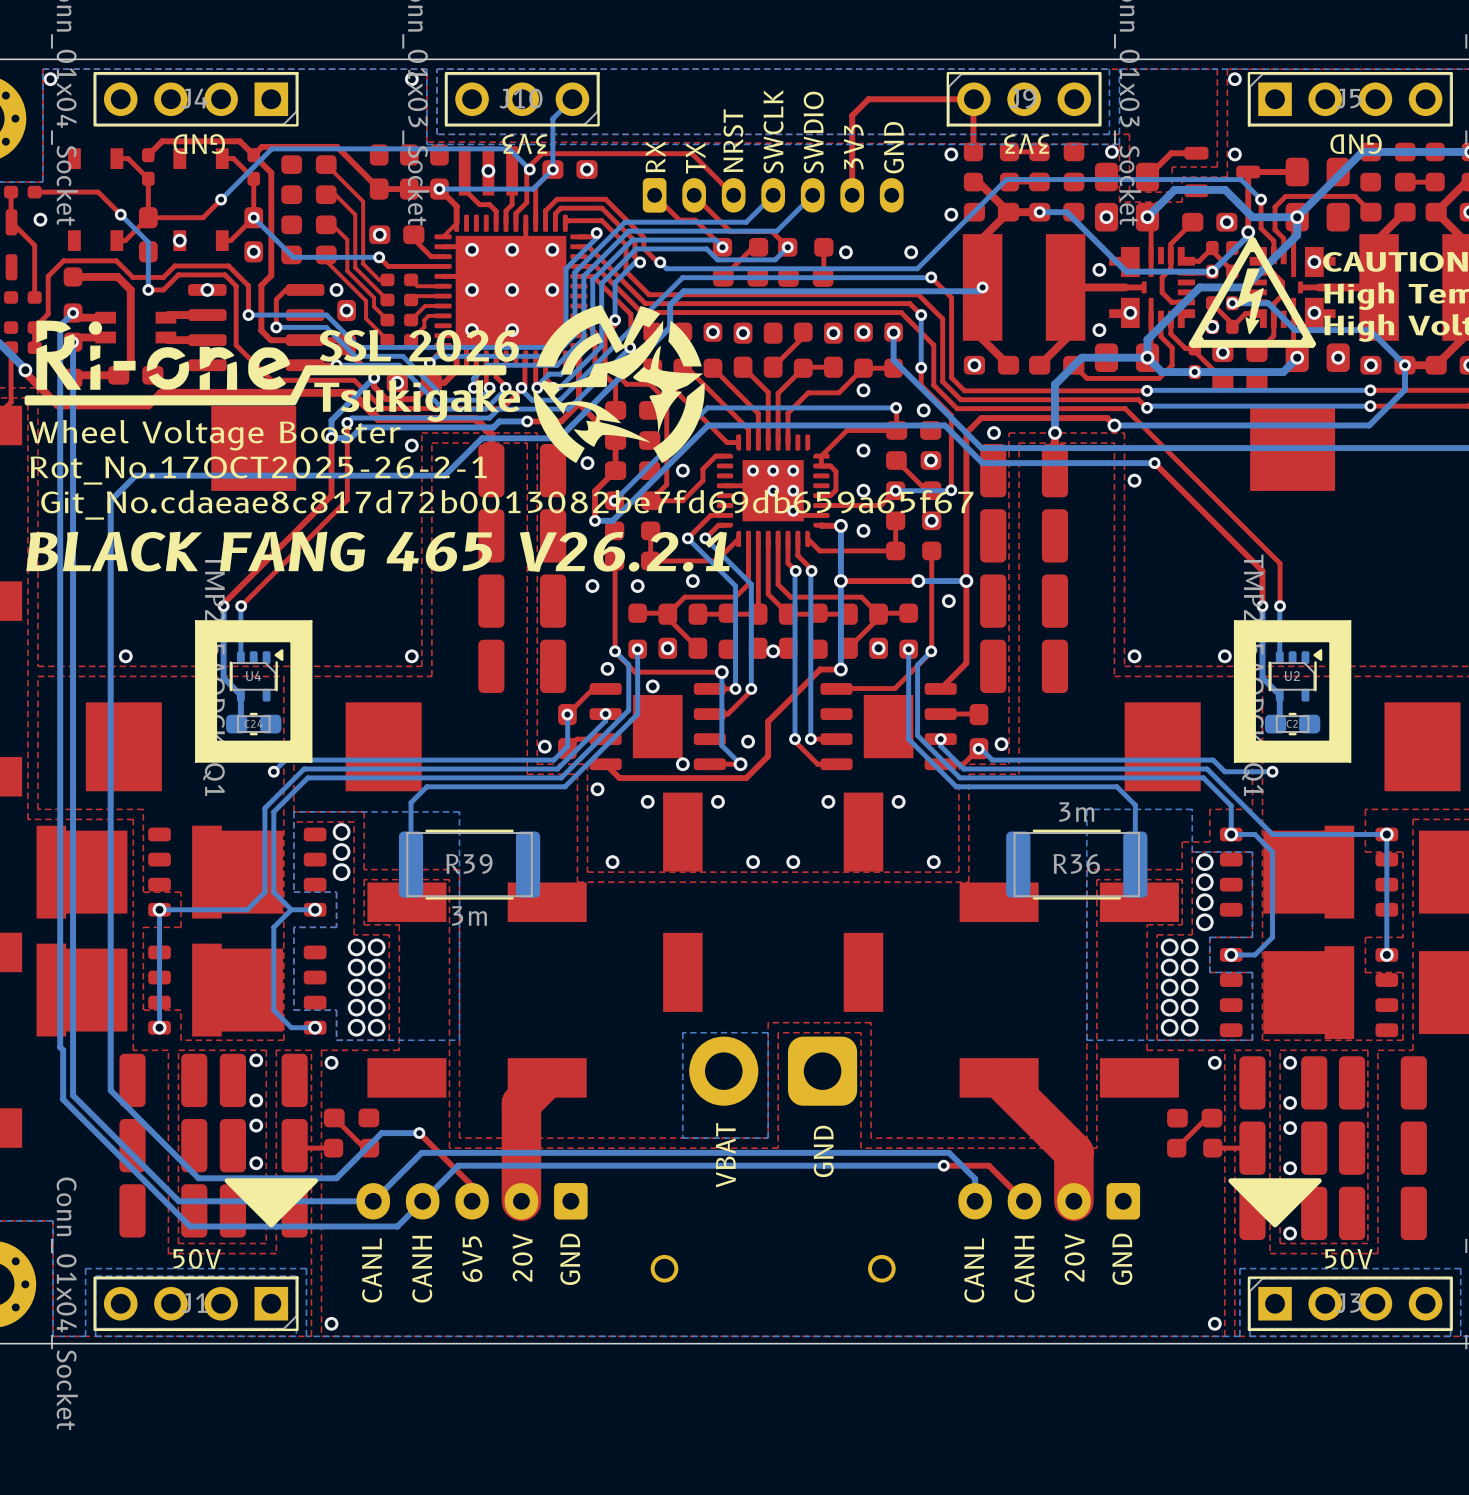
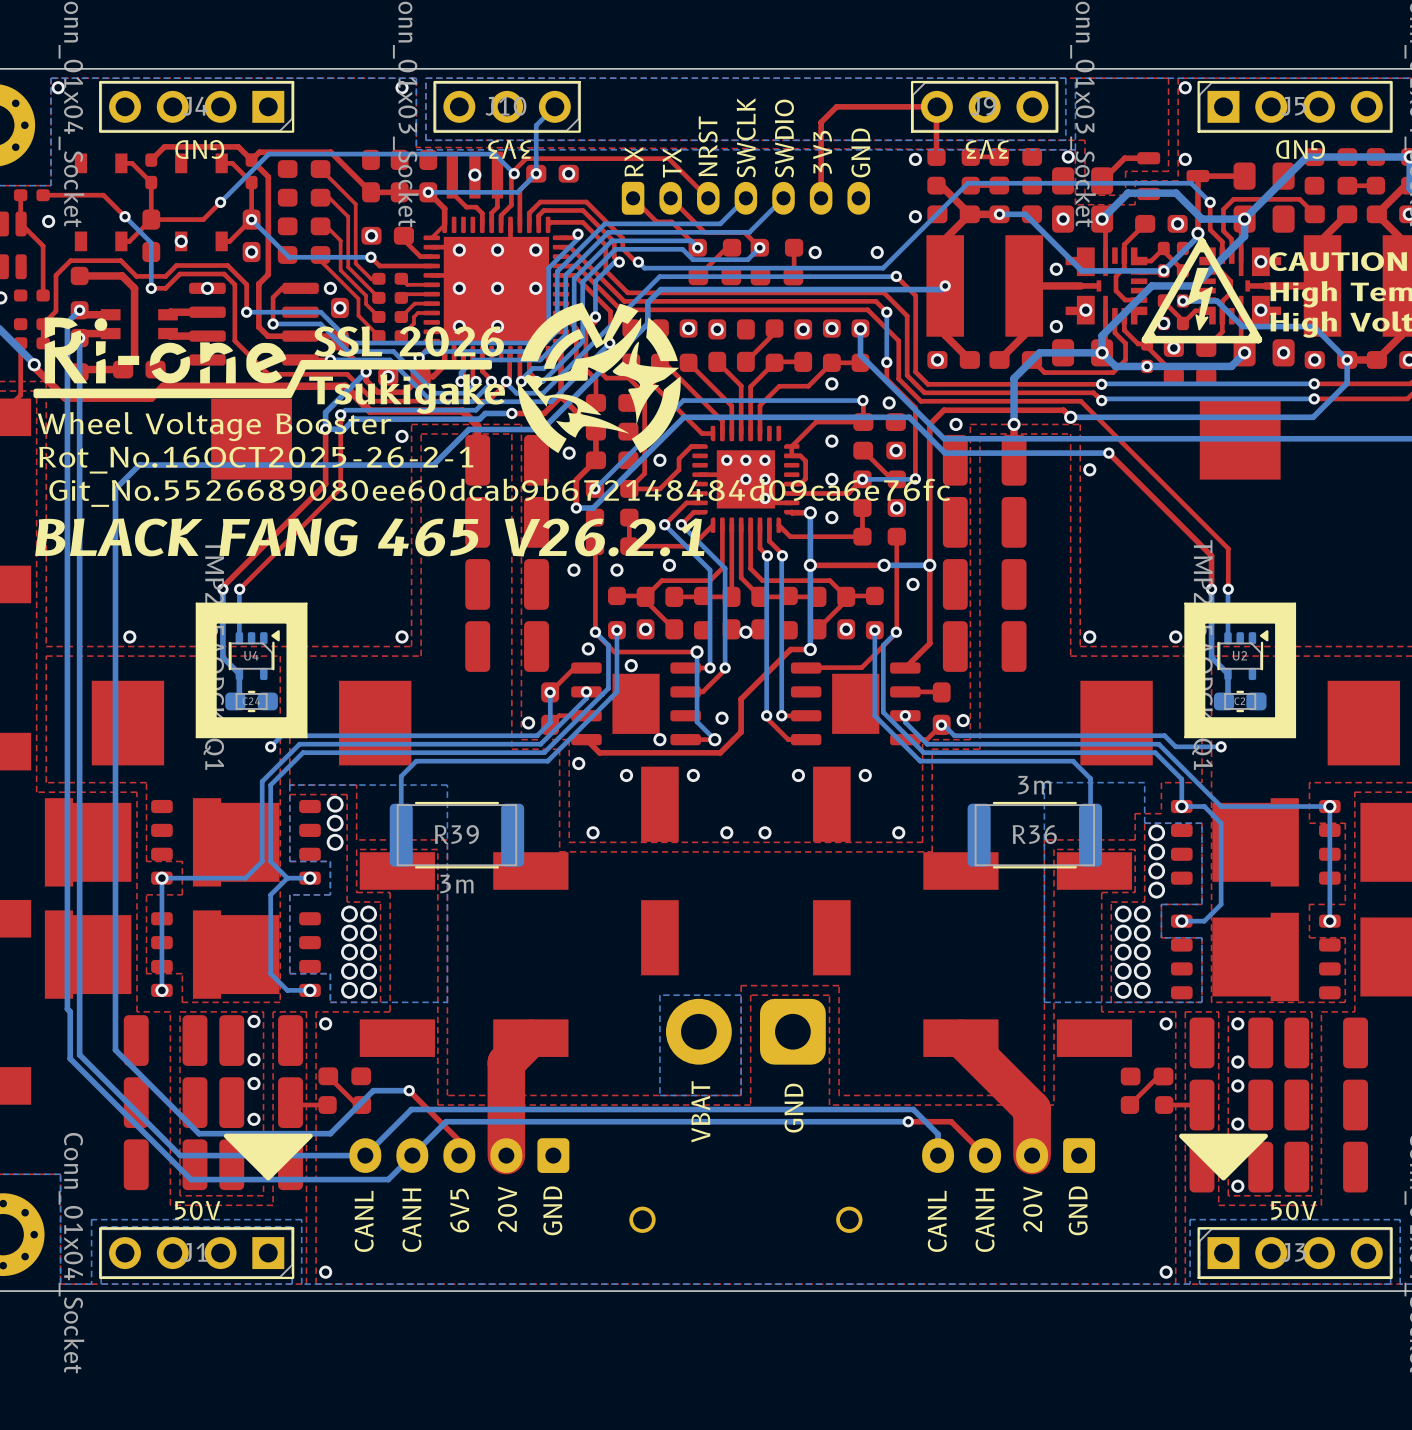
text: Rot_No.17OCT2025-26-2-1 (258, 470) -> Rot_No.16OCT2025-26-2-1 (256, 460)
text: Git_No.cdaeae8c817d72b0013082be7fd69db659a65f67 (507, 504) -> Git_No.5526689080ee60dcab9b672148484d09ca6e76fc (499, 492)

